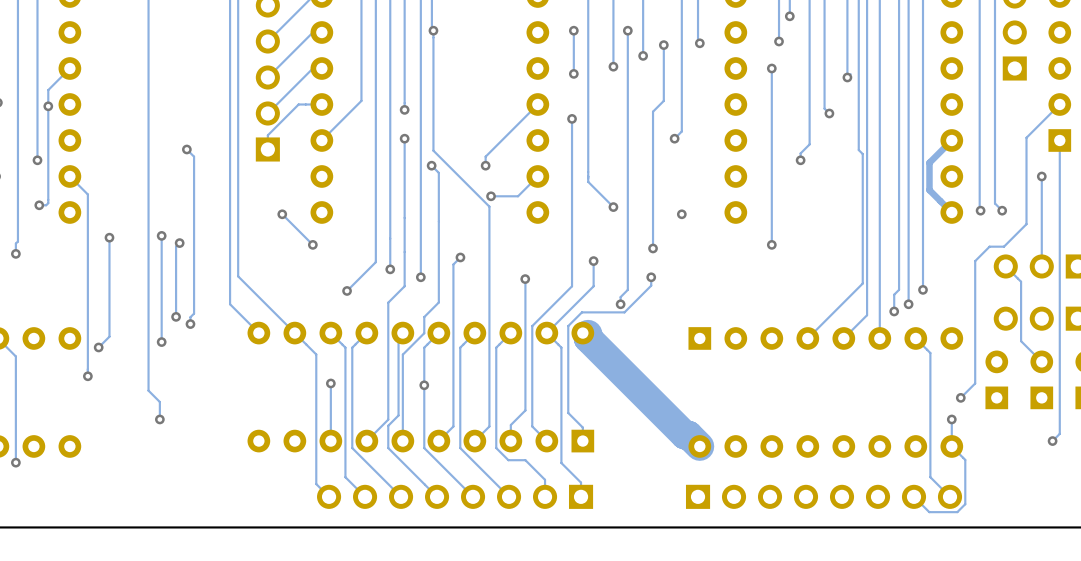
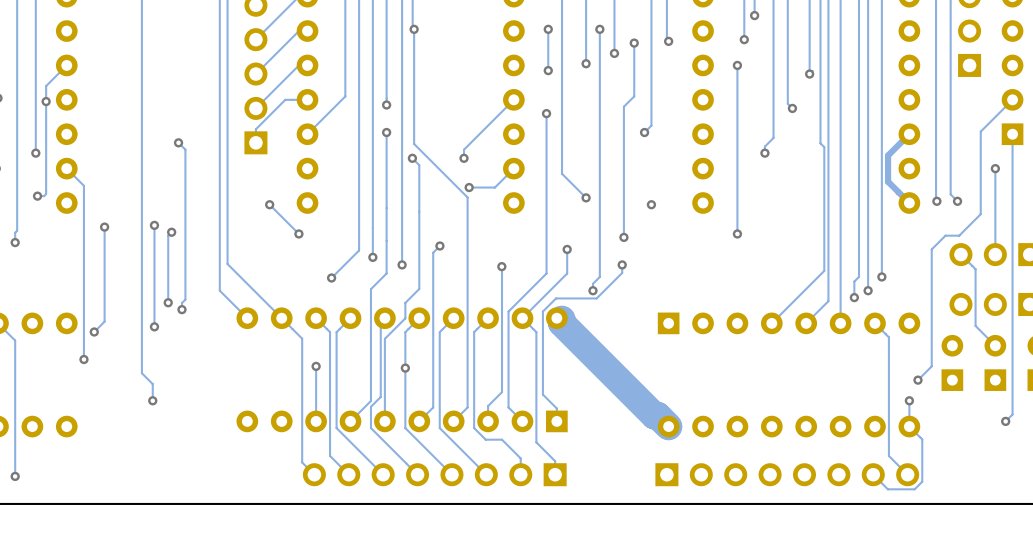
track: none -> (15, 442) (15, 476)
via position: (15, 462) -> (15, 476)

